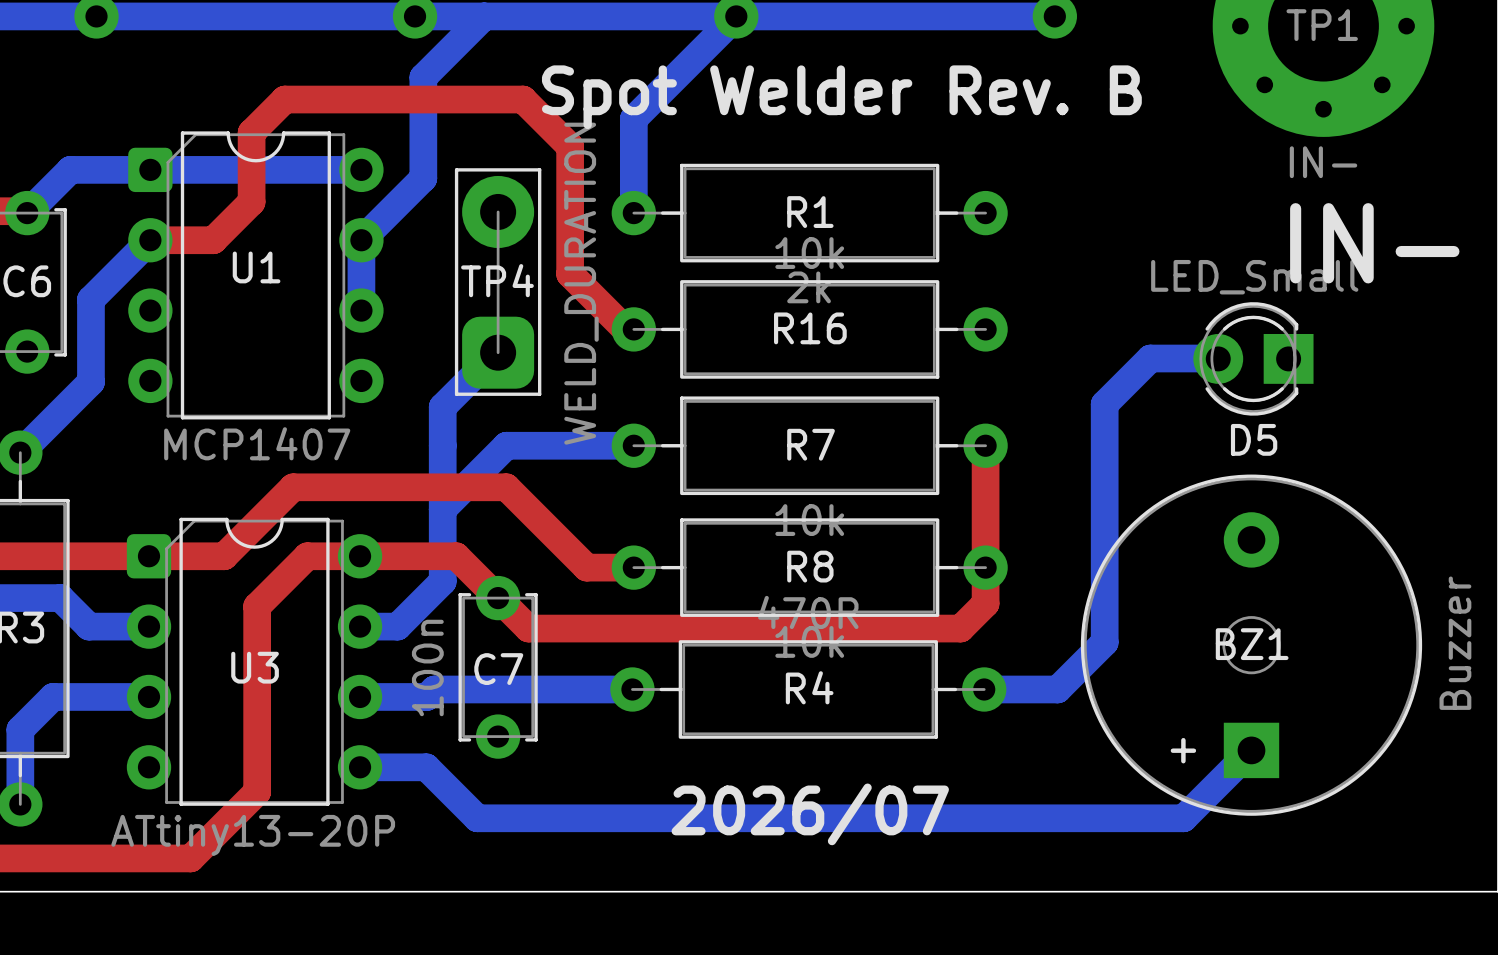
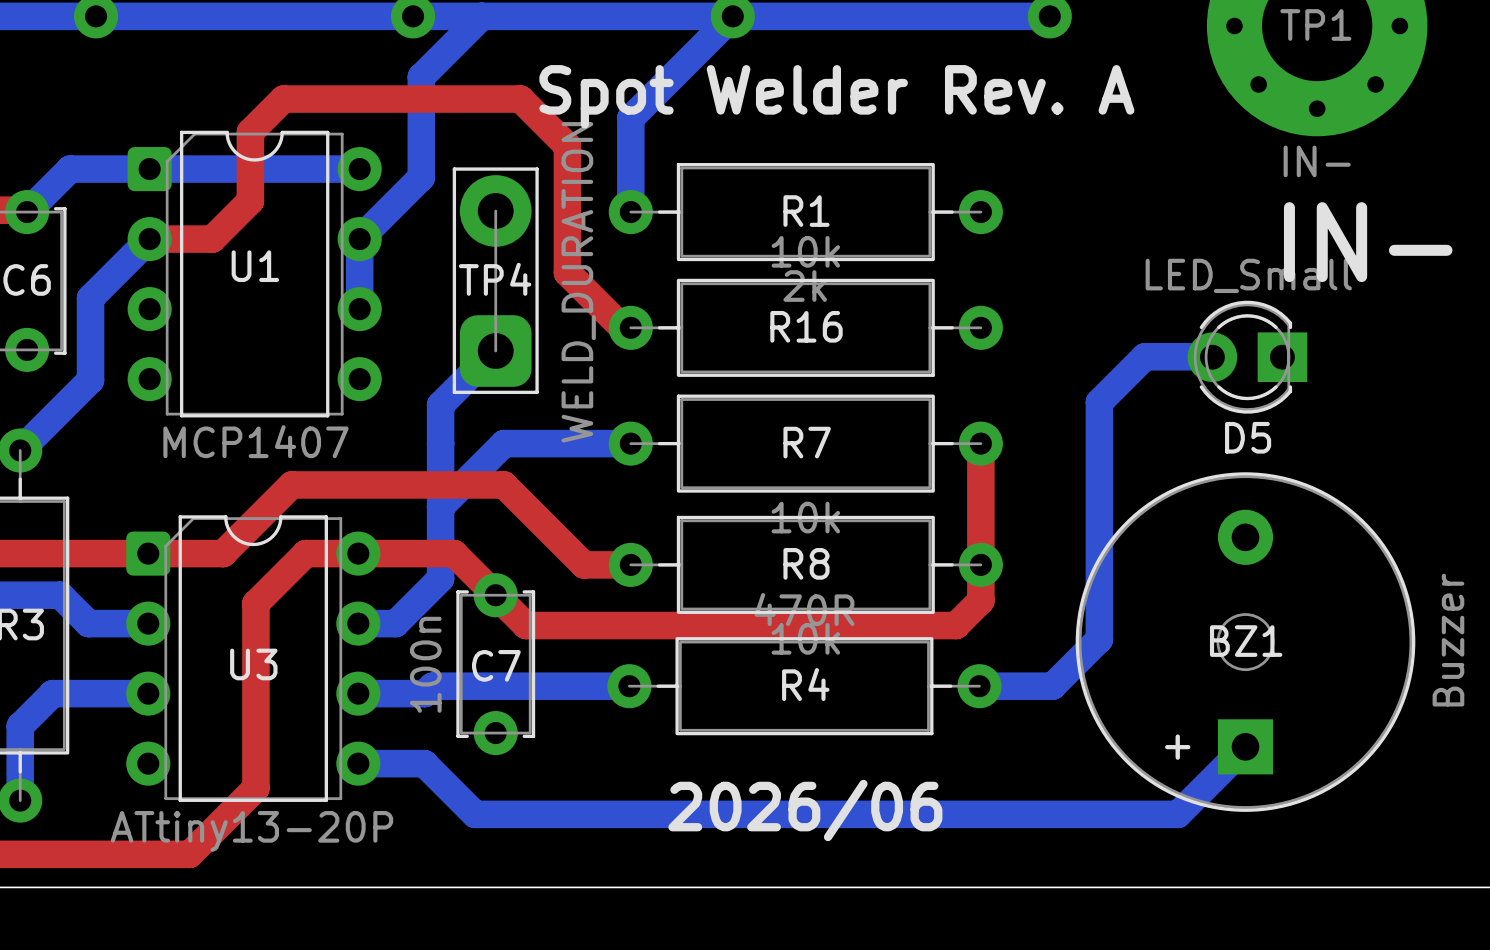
text: Spot Welder Rev. B (841, 97) -> Spot Welder Rev. A (836, 96)
text: 2026/07 (810, 814) -> 2026/06 (805, 810)

